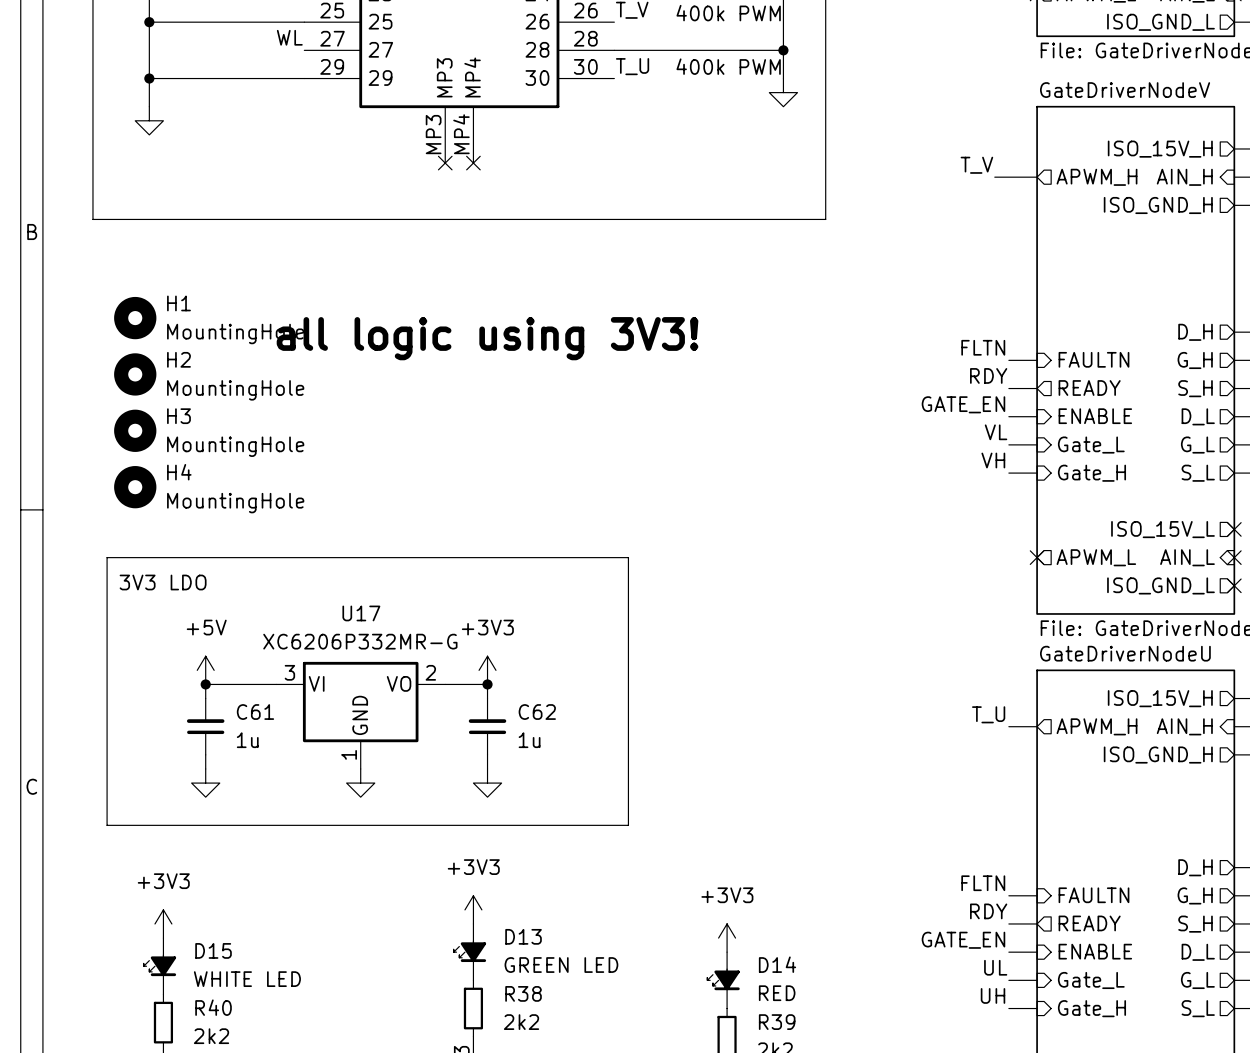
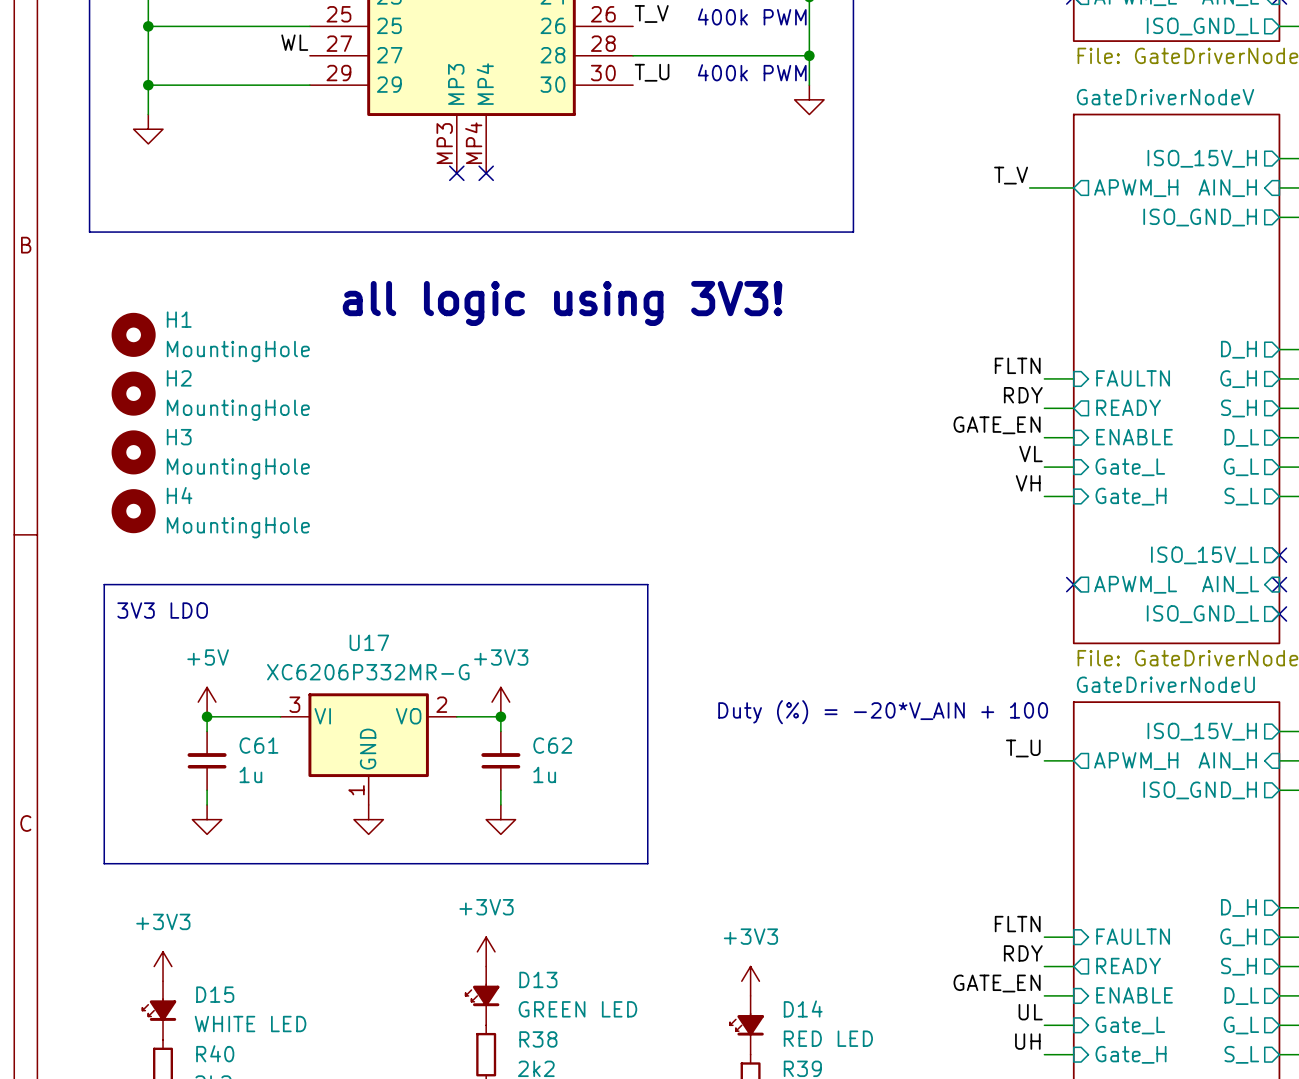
text position: all logic using 3V3! (487, 338) -> all logic using 3V3! (562, 303)
text: none -> Duty (%) = -20*V_AIN + 100 (883, 712)
D14 value: RED (777, 993) -> RED LED (828, 1038)

